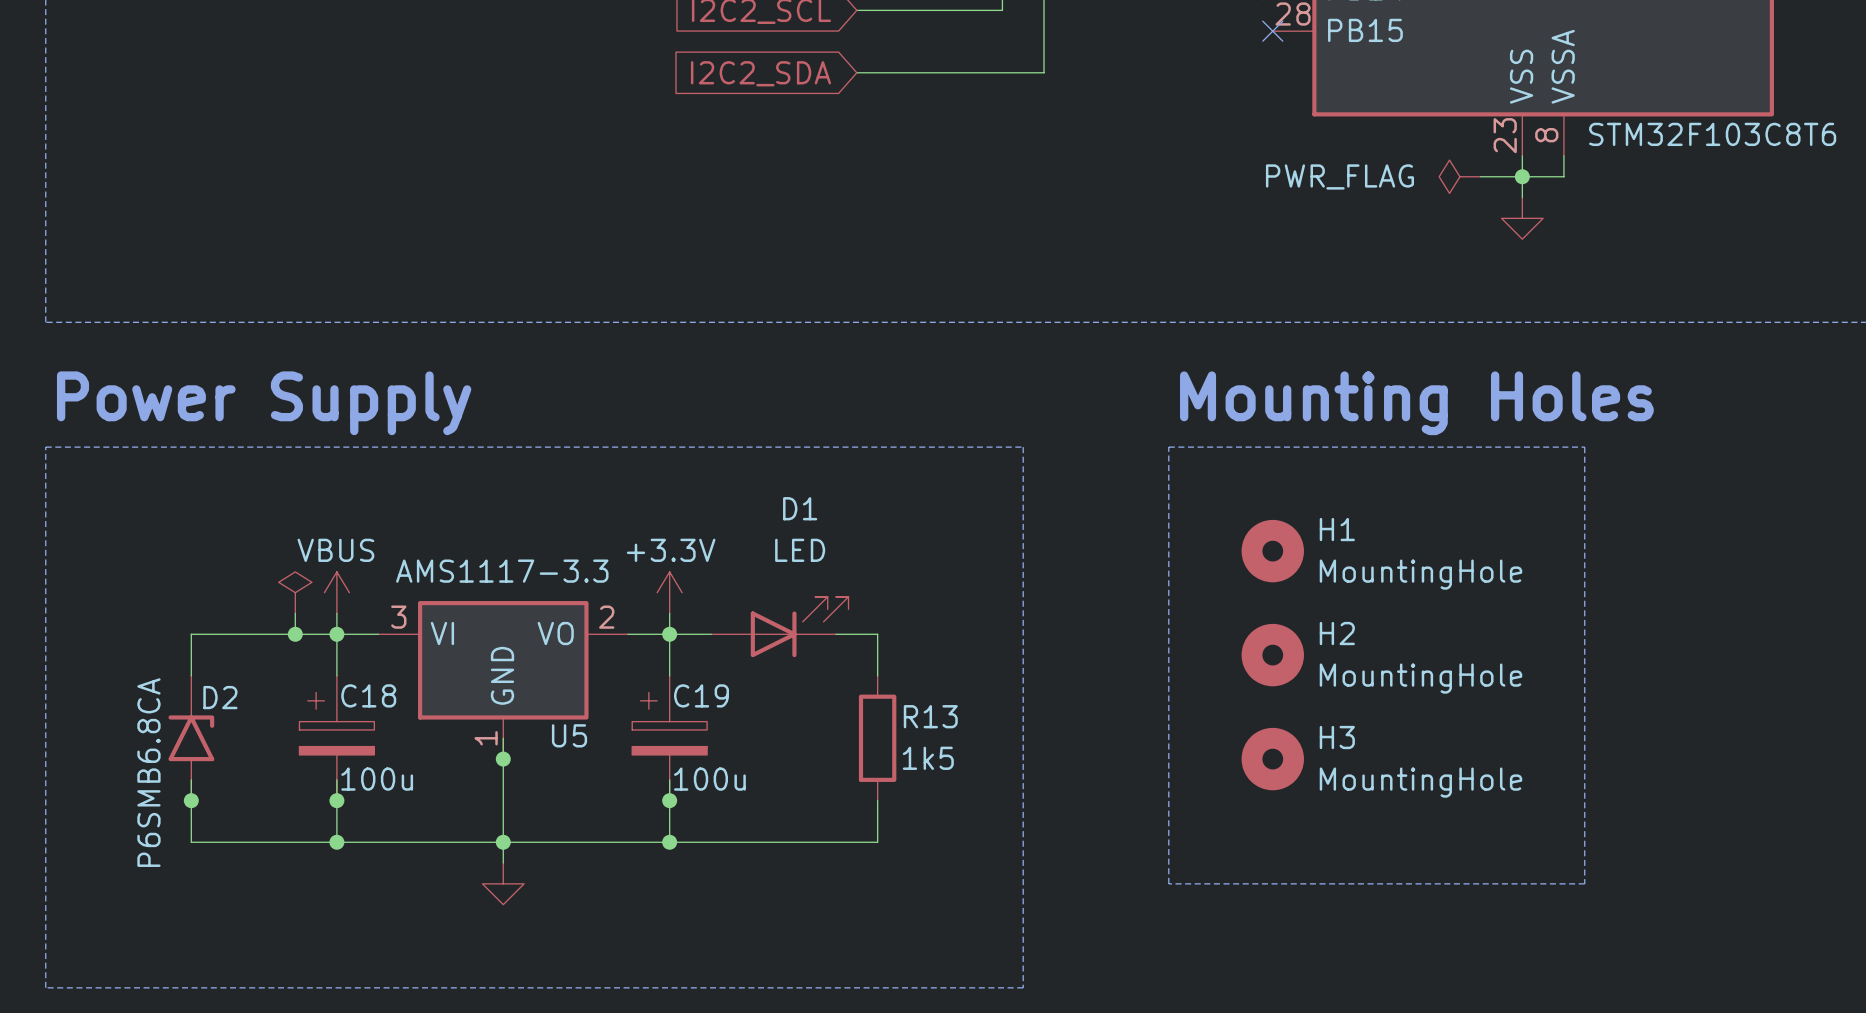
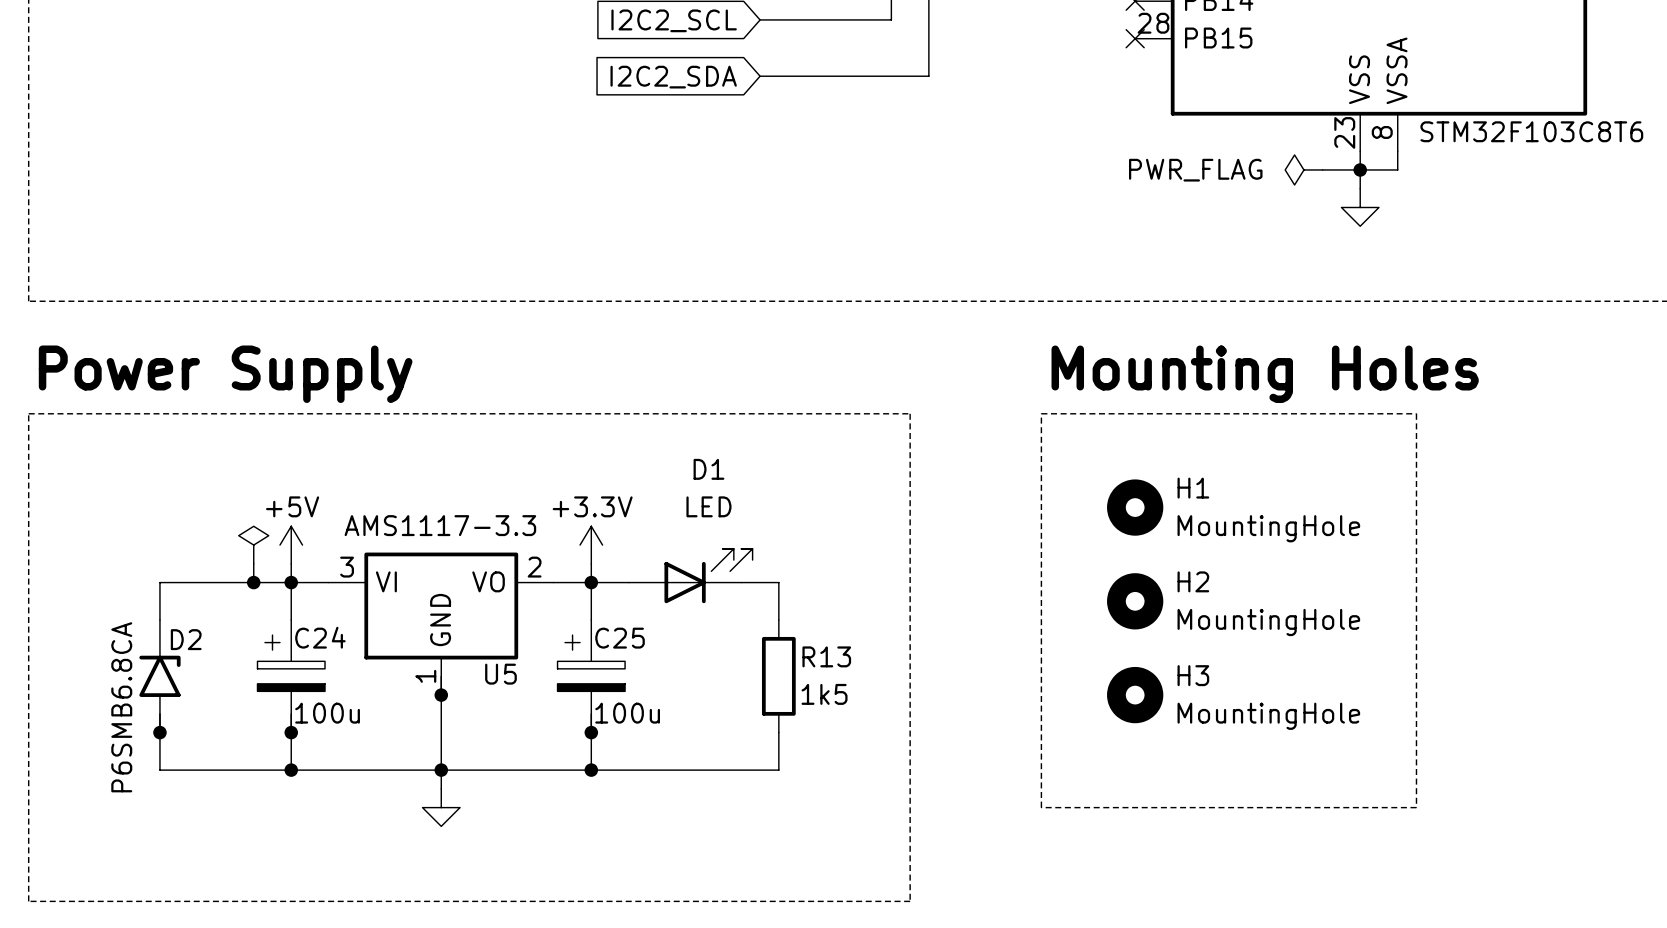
power symbol: VBUS (336, 592) -> +5V (291, 545)
C18 name: C18 (368, 695) -> C24 (320, 637)
C19 name: C19 (701, 695) -> C25 (620, 638)

